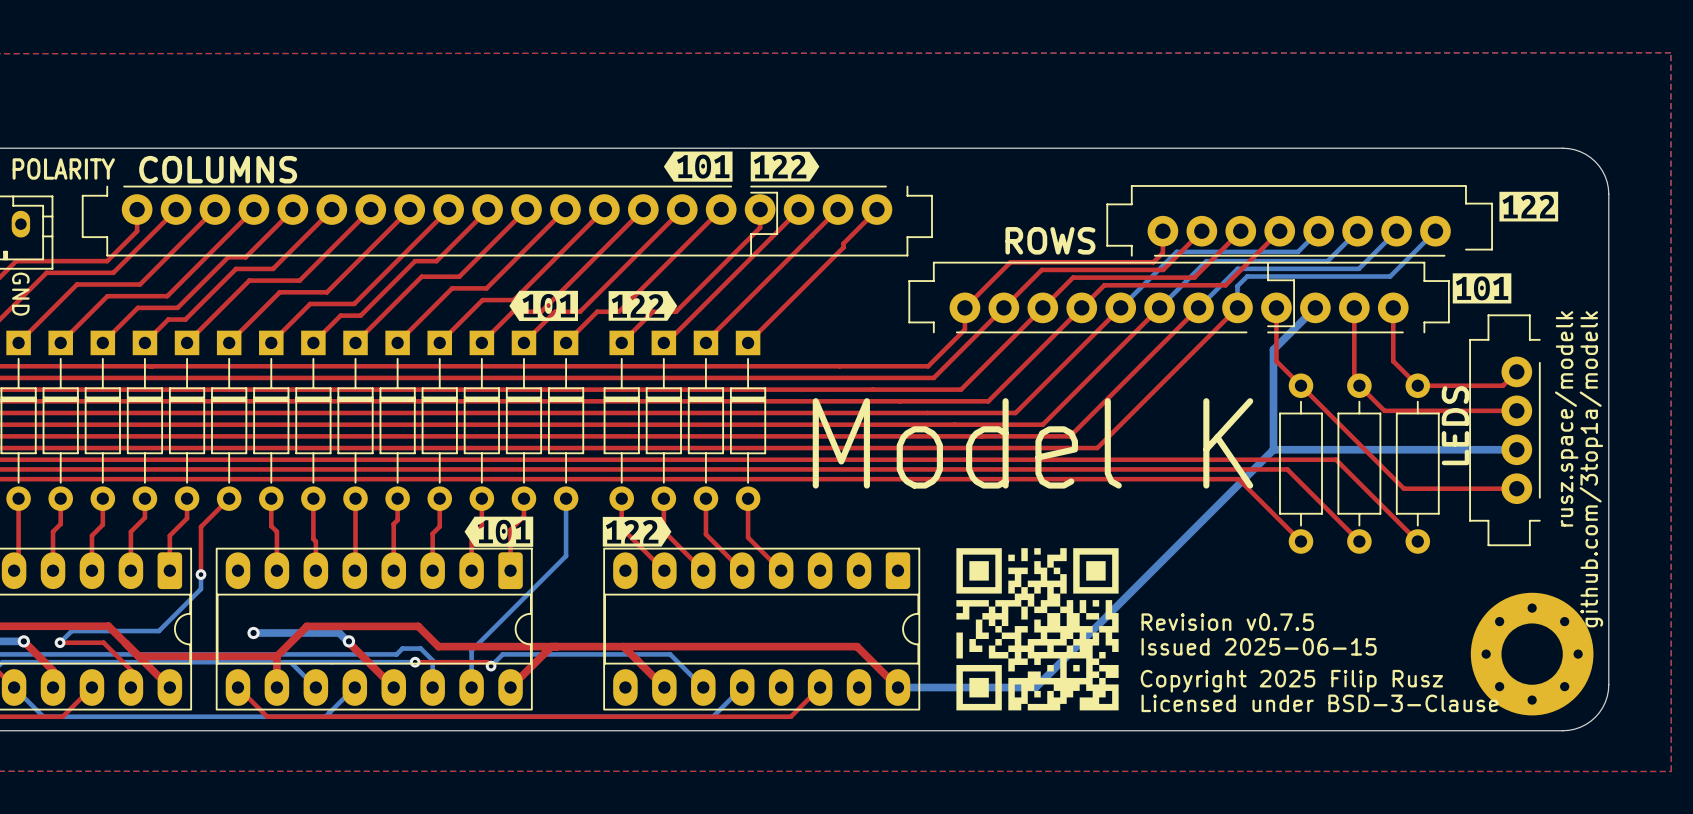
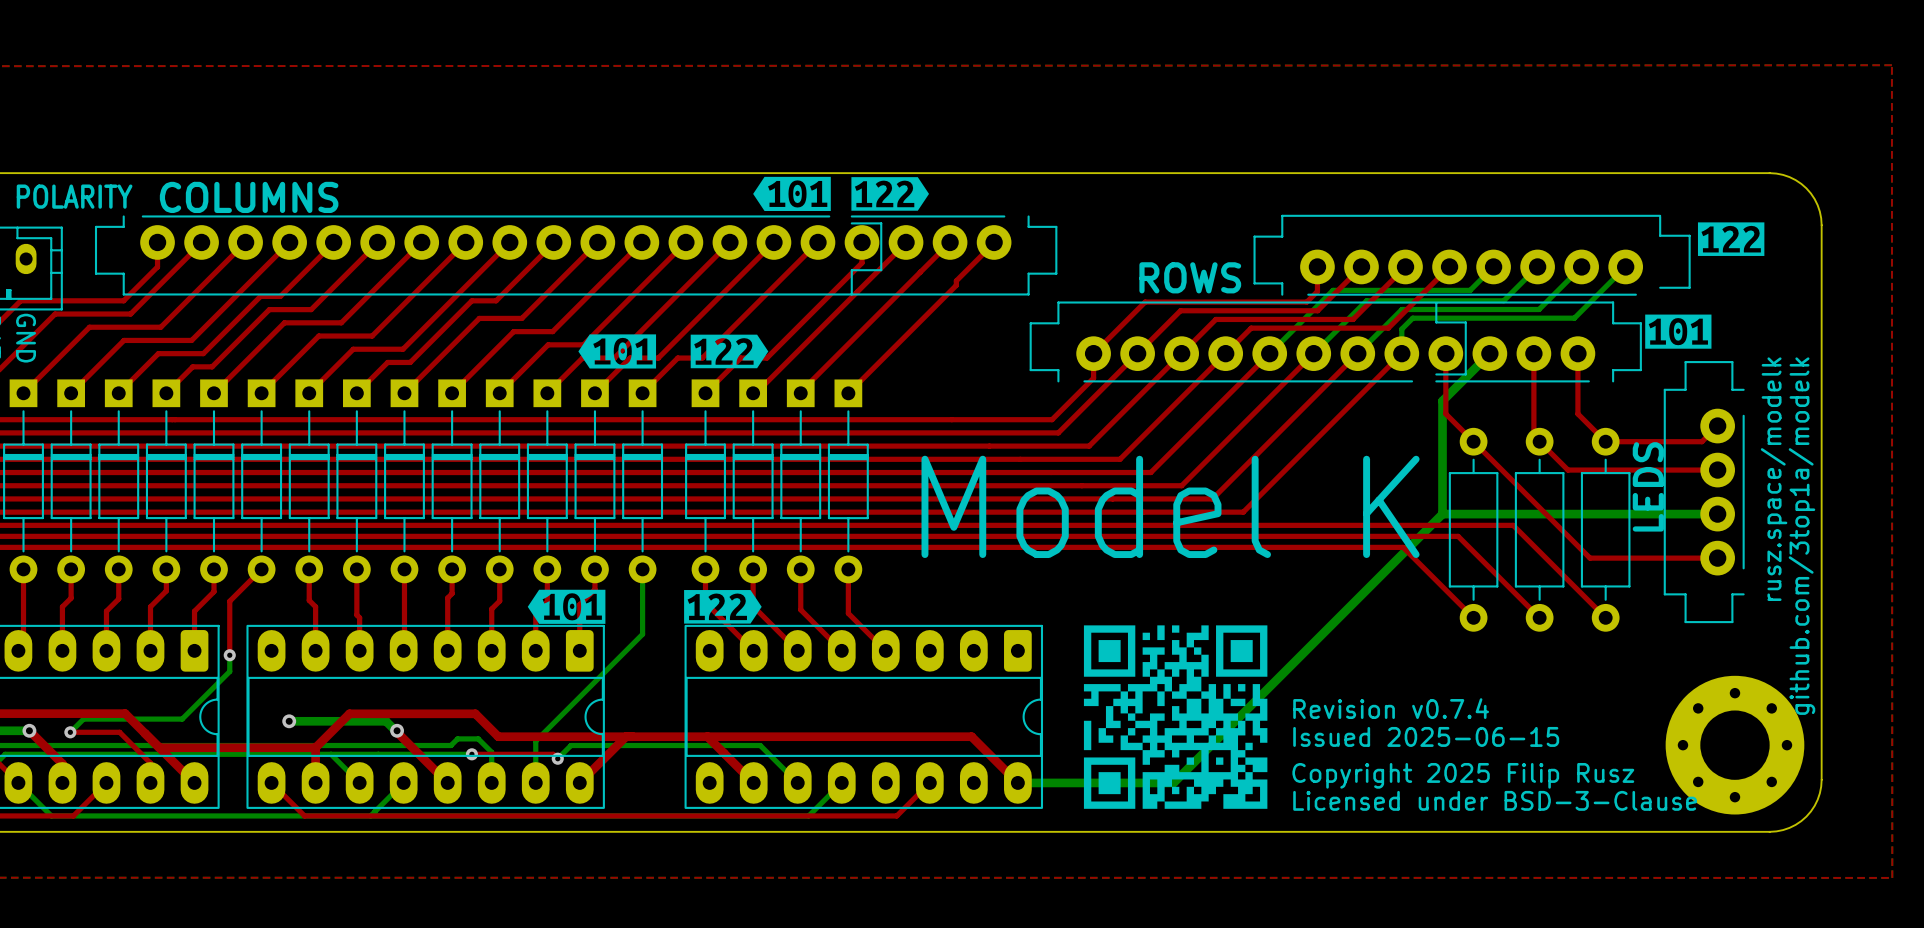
text: Revision v0.7.5 (1227, 622) -> Revision v0.7.4 (1391, 708)

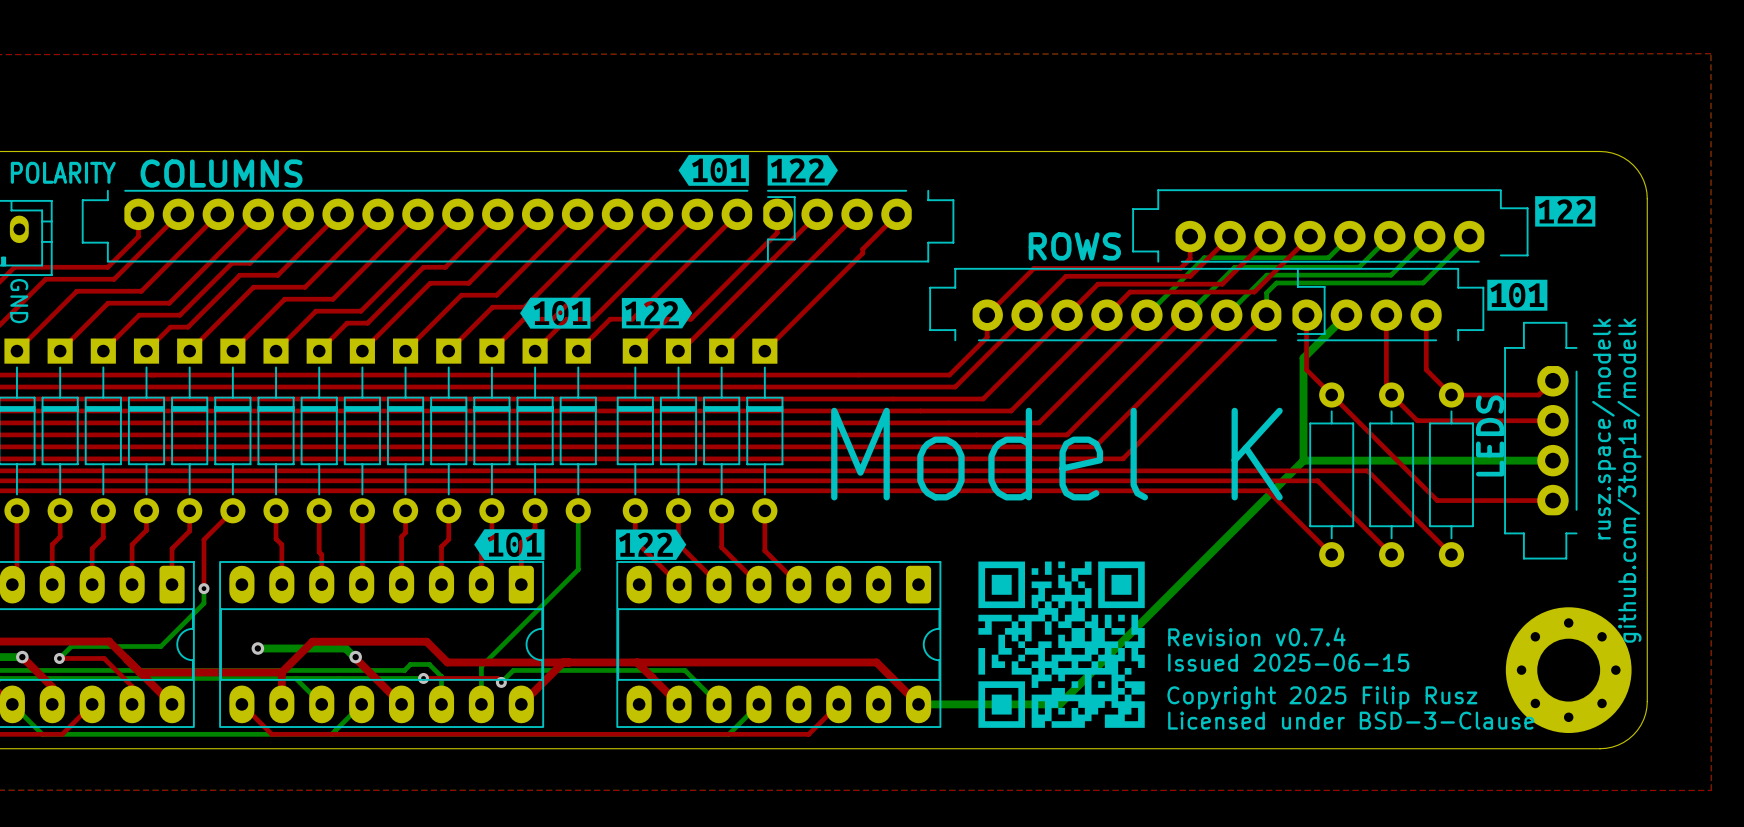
part footprint: [1253, 214, 1691, 296] -> [1132, 189, 1529, 263]
part footprint: [94, 215, 1058, 296] -> [81, 188, 955, 263]
part footprint: [1029, 301, 1642, 383] -> [929, 267, 1485, 342]
part footprint: [1663, 361, 1745, 624] -> [1504, 321, 1578, 560]

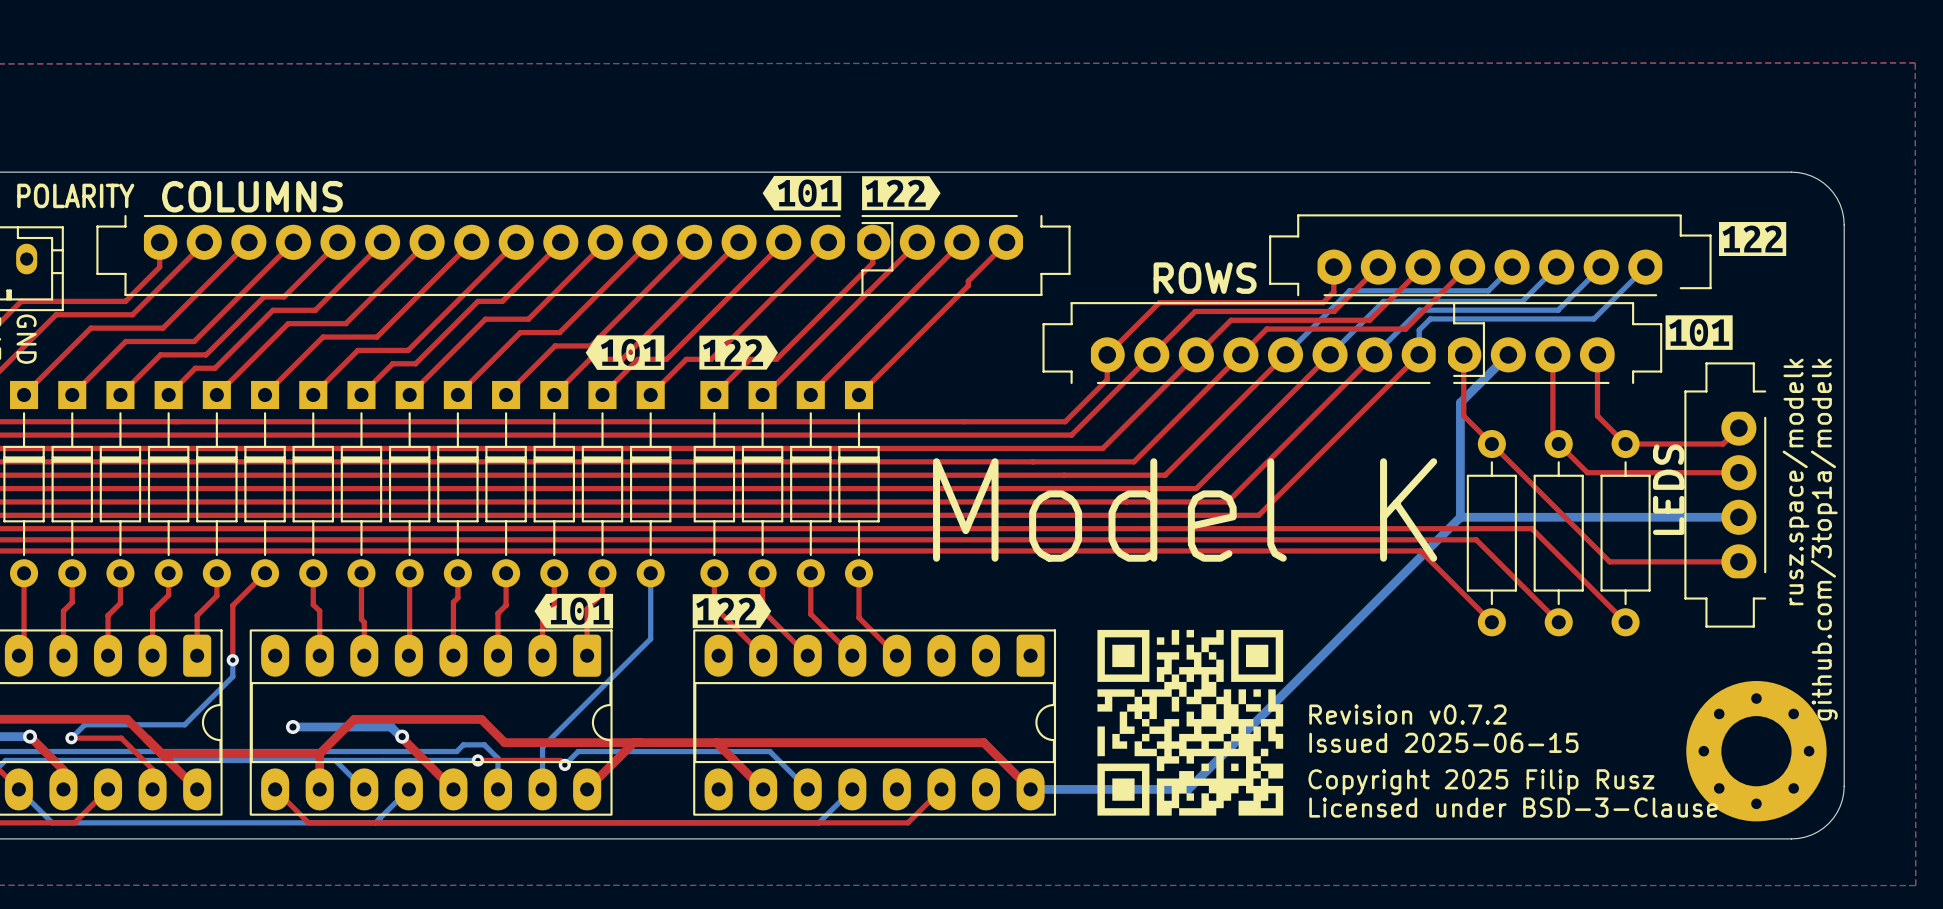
text: Revision v0.7.4 (1256, 636) -> Revision v0.7.2 (1407, 714)

